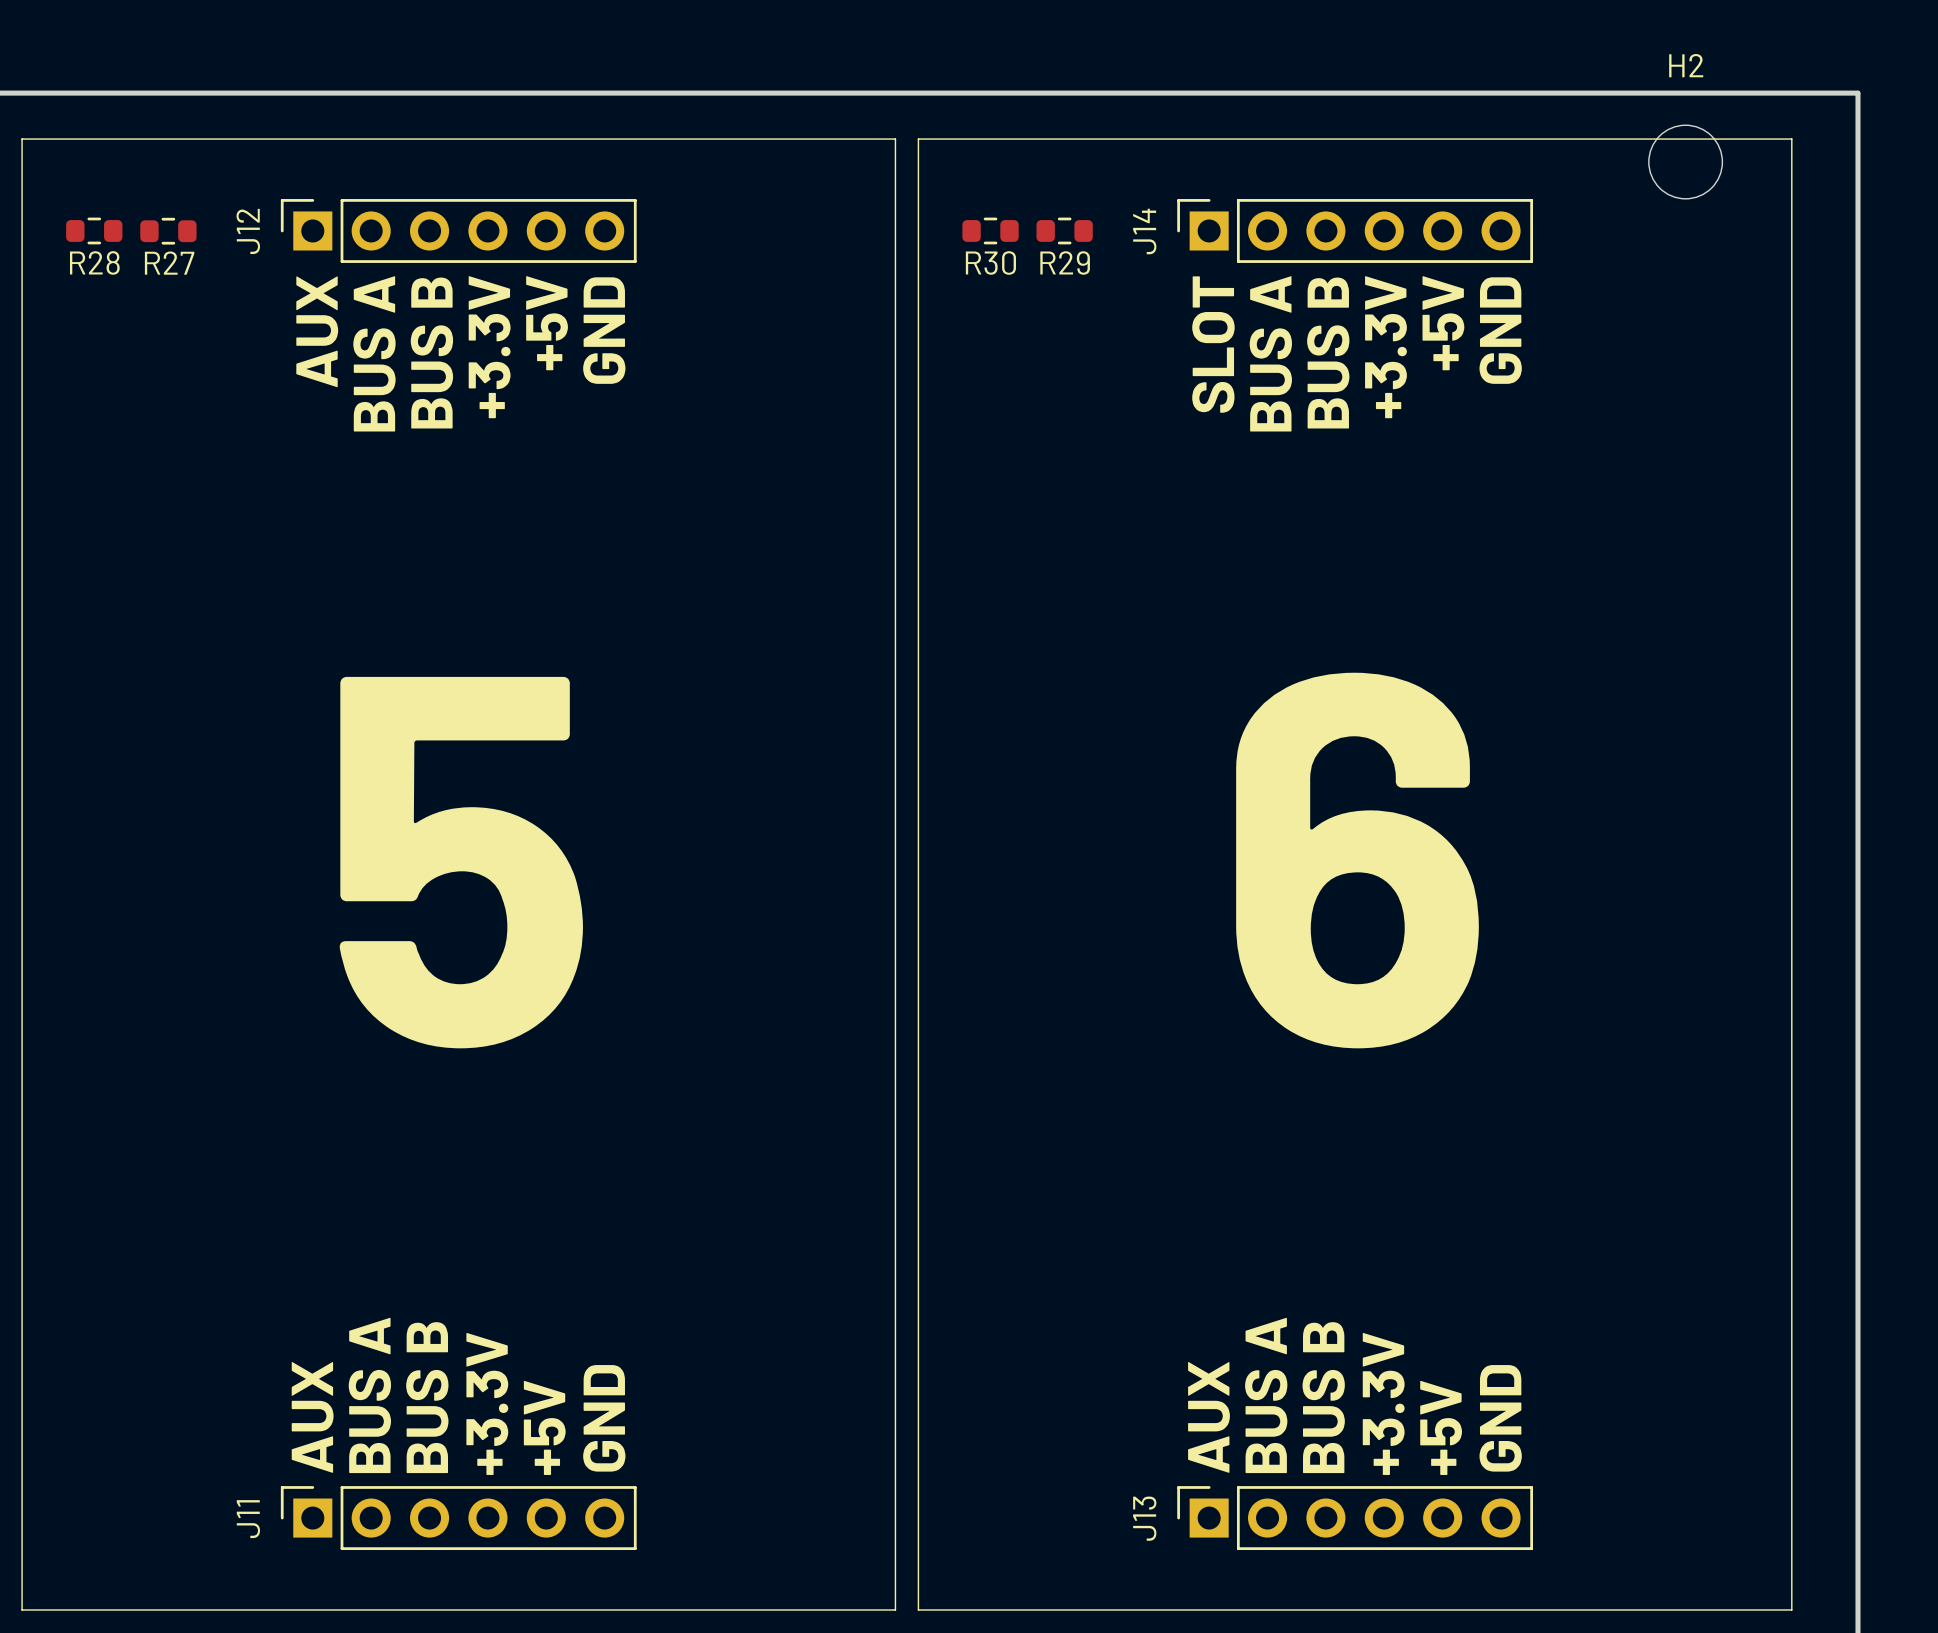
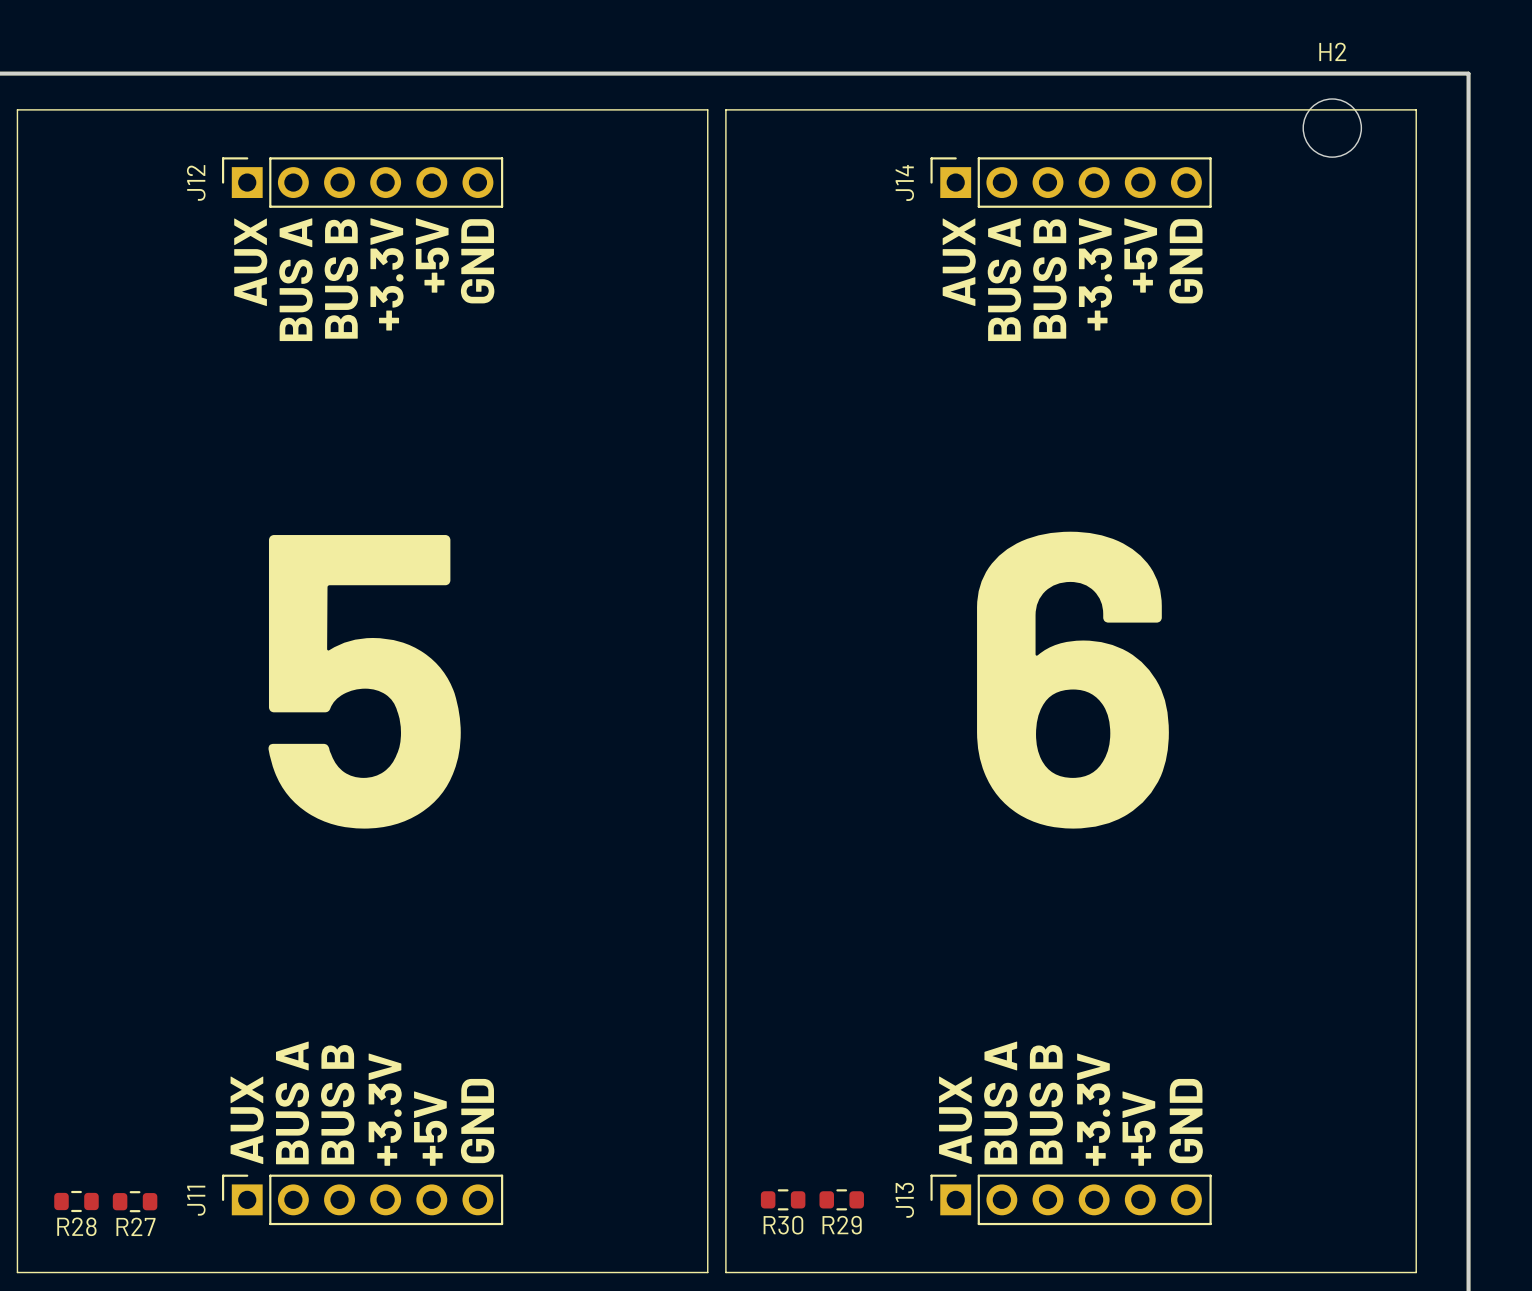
R28 position: (94, 230) -> (76, 1201)
R30 position: (990, 230) -> (783, 1199)
R29 position: (1064, 230) -> (841, 1199)
R27 position: (168, 231) -> (135, 1201)
text: SLOT (1213, 344) -> AUX (959, 262)

